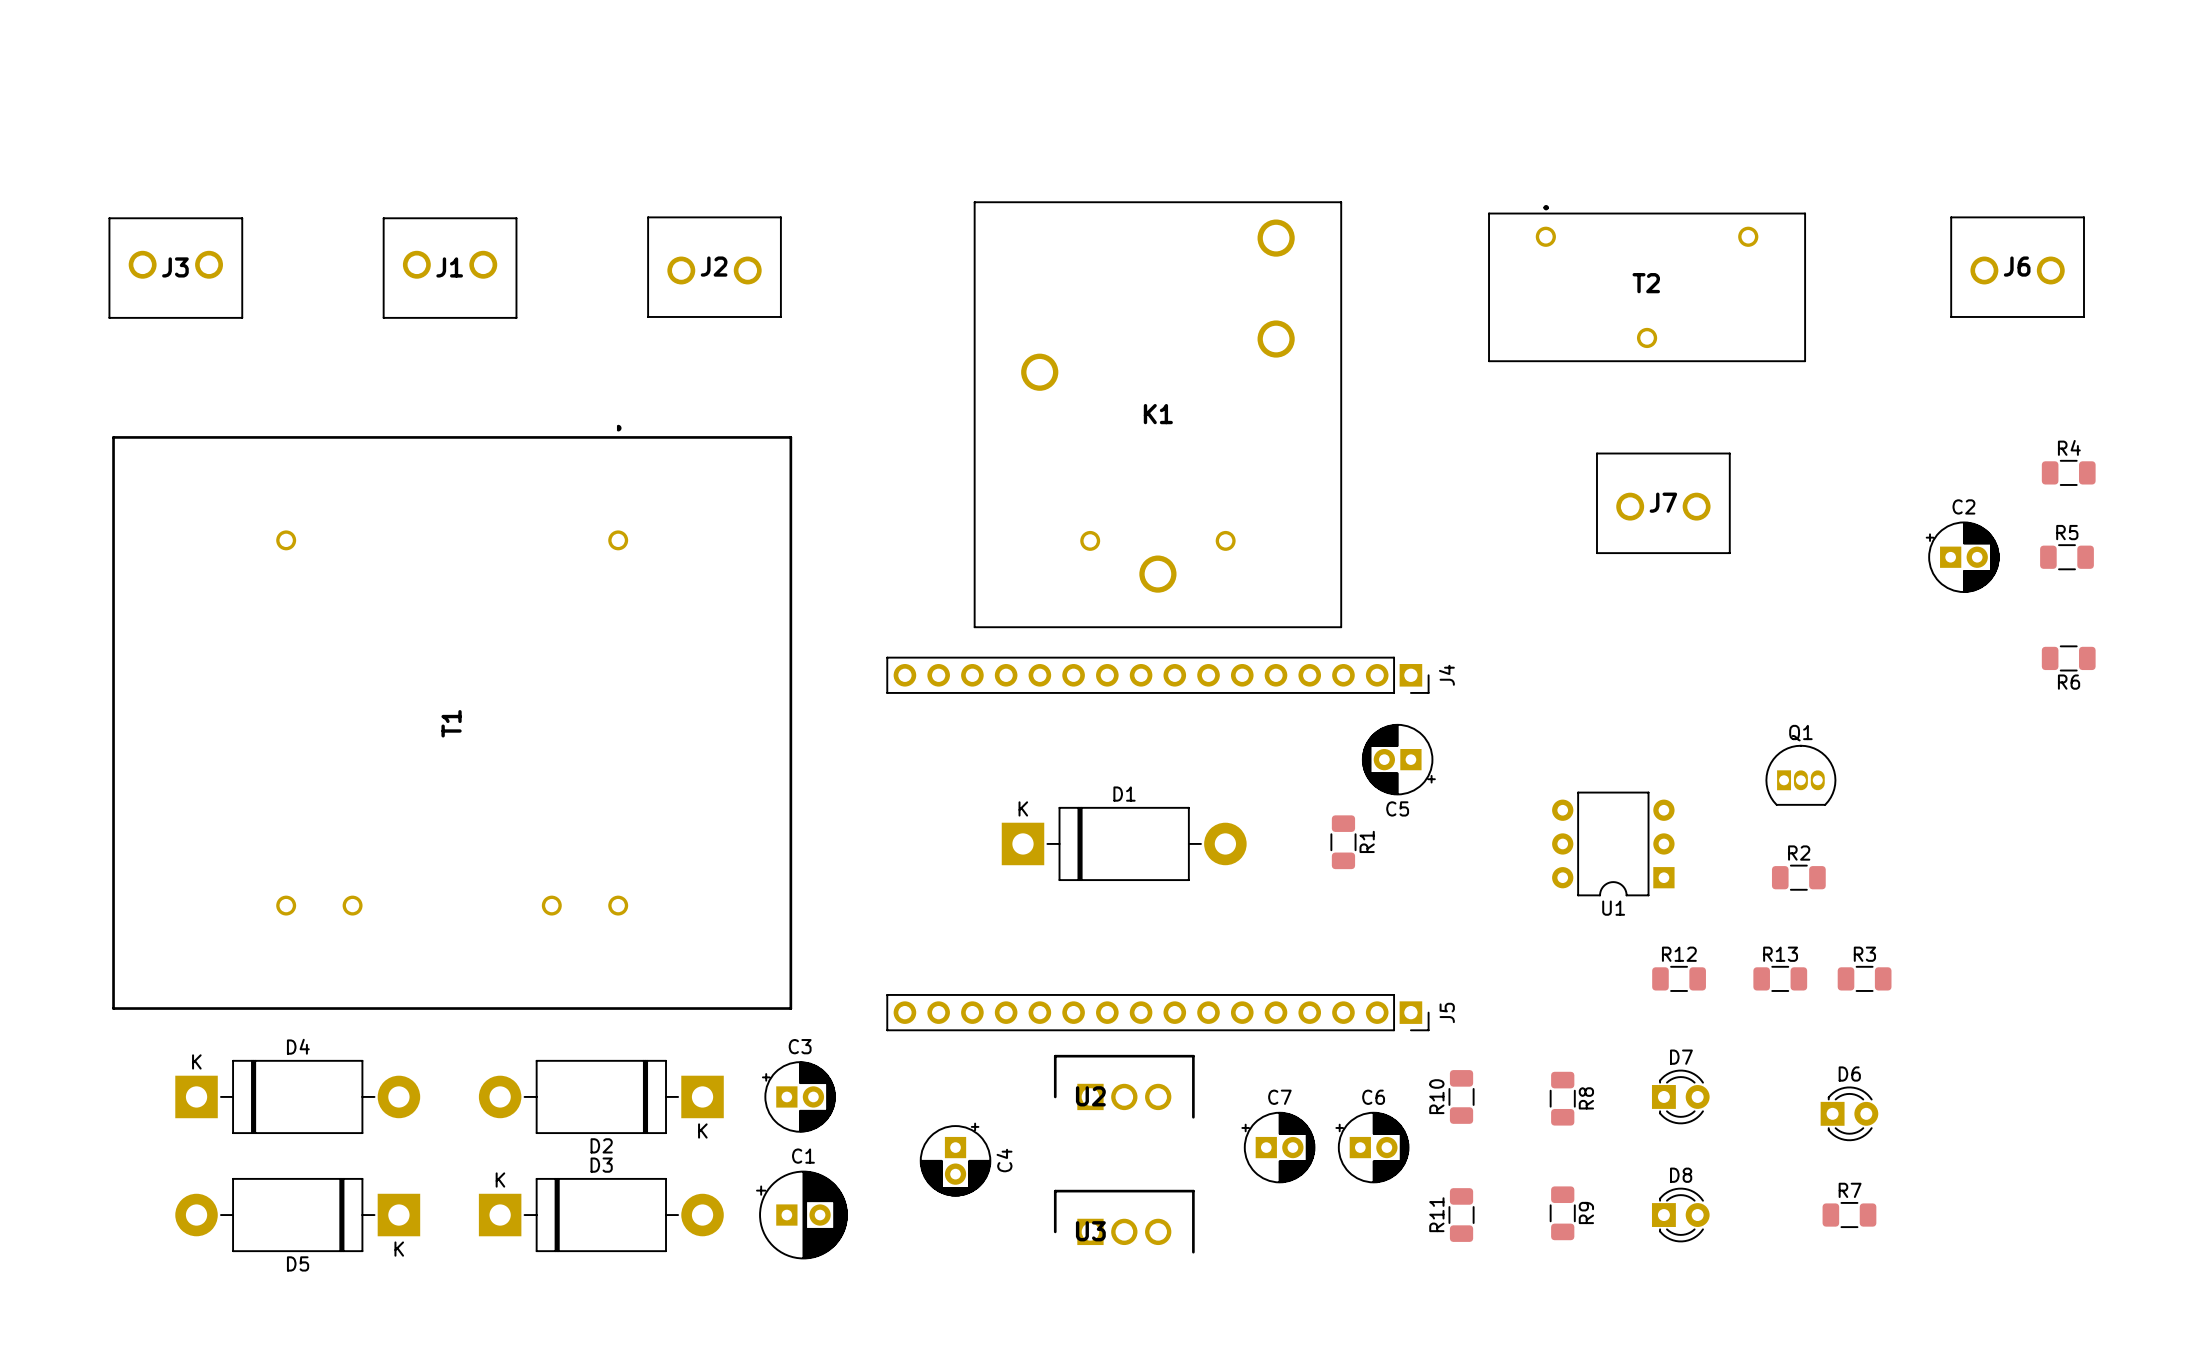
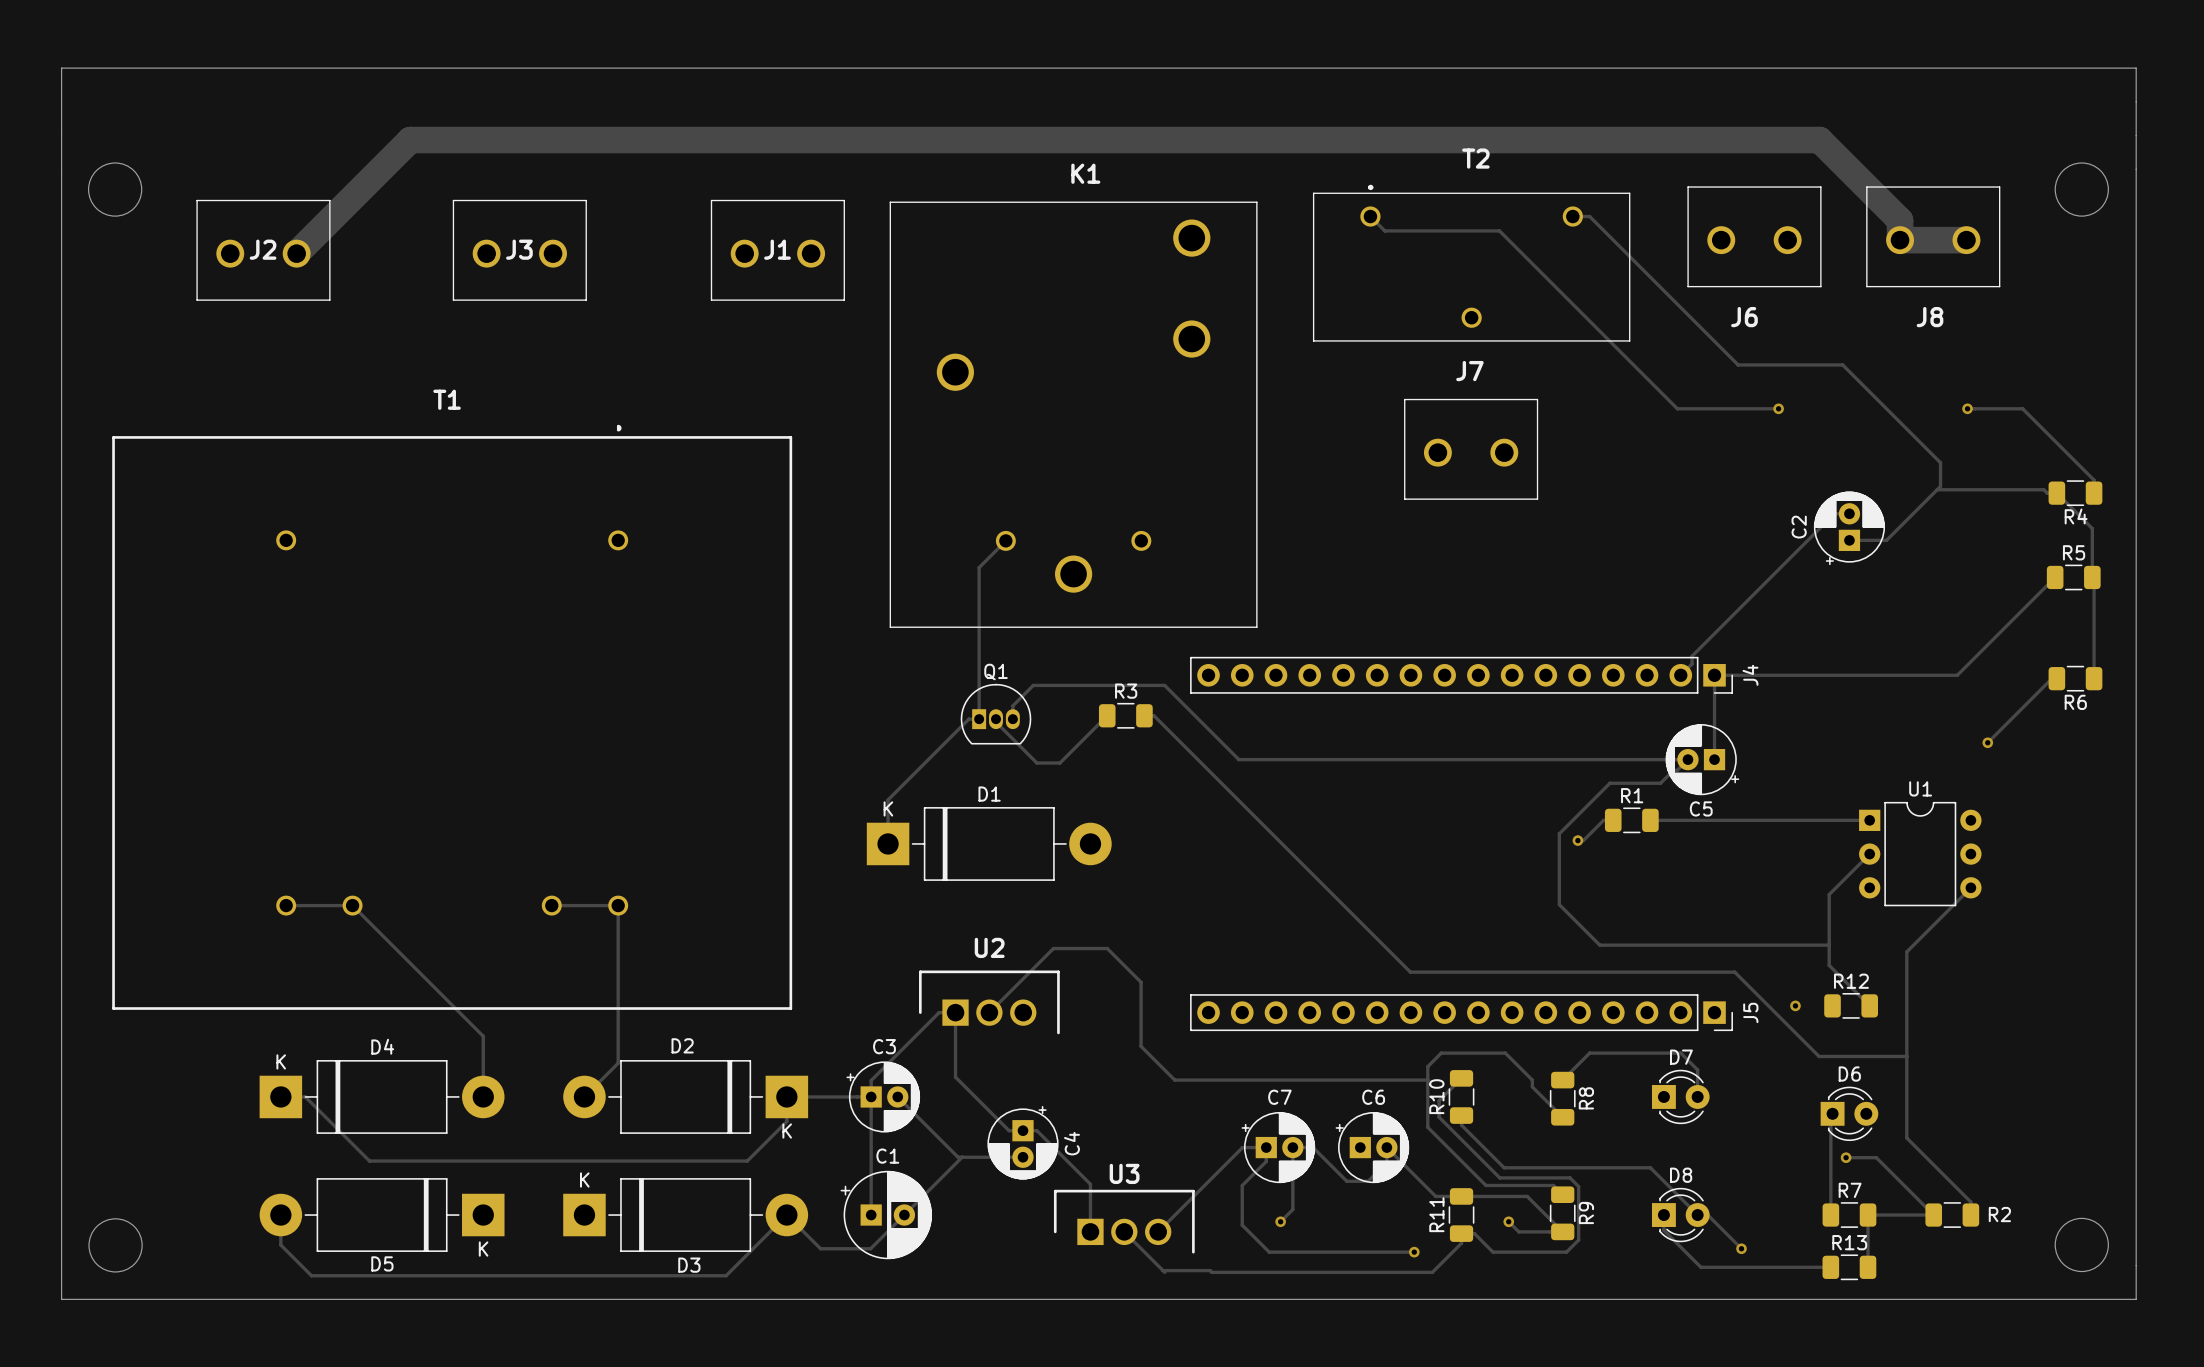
board edge: none -> (61, 68) (61, 1299) (2136, 1299) (2136, 68) (61, 68)
round board edge: none -> [88, 162, 143, 217]
round board edge: none -> [2054, 162, 2109, 217]
track: none -> (1370, 216) (1384, 230) (1499, 230) (1677, 408) (1778, 408)
track: none -> (1572, 216) (1589, 216) (1738, 364) (1842, 364) (1940, 462) (1940, 486) (1886, 540) (1849, 540)
J8: none -> (1933, 236)
track: none -> (1966, 240) (1900, 240) (1900, 220) (1819, 140) (410, 140) (296, 253)
J6 name position: J6 (2017, 266) -> J6 (1744, 317)
J2 position: (714, 267) -> (263, 250)
J6 position: (2017, 267) -> (1754, 236)
J3 rotation: 0° (175, 268) -> 180° (519, 250)
J3 position: (175, 268) -> (519, 250)
J1 rotation: 0° (450, 268) -> 180° (777, 250)
J1 position: (450, 268) -> (777, 250)
T2 name position: T2 (1646, 283) -> T2 (1475, 158)
T2 position: (1647, 283) -> (1471, 263)
via: none -> (1778, 408)
track: none -> (1967, 408) (2022, 408) (2094, 480) (2094, 493)
via: none -> (1967, 408)
K1 position: (1157, 414) -> (1073, 414)
K1 name position: K1 (1158, 414) -> K1 (1085, 173)
R4 name position: R4 (2069, 447) -> R4 (2076, 516)
R4 position: (2068, 472) -> (2075, 493)
track: none -> (1937, 489) (2043, 489) (2047, 493) (2056, 493) (2092, 528) (2094, 678)
J7 name position: J7 (1663, 502) -> J7 (1469, 371)
J7 position: (1663, 503) -> (1471, 449)
track: none -> (1849, 513) (1834, 513) (1692, 656) (1692, 664) (1680, 675)
track: none -> (1005, 540) (979, 567) (979, 719) (968, 719) (888, 799) (888, 843)
C2 rotation: 0° (1962, 557) -> 90° counterclockwise (1849, 528)
C2 position: (1962, 557) -> (1849, 528)
R5 position: (2066, 557) -> (2073, 577)
track: none -> (2055, 577) (1957, 675) (1714, 675) (1714, 759)
R6 position: (2068, 658) -> (2075, 678)
J4 position: (1157, 675) -> (1461, 675)
track: none -> (2056, 678) (2051, 678) (1987, 742)
track: none -> (1107, 715) (1060, 763) (1036, 763) (996, 722) (996, 719)
track: none -> (1144, 715) (1154, 715) (1410, 972) (1734, 972) (1819, 1056) (1906, 1056)
track: none -> (1012, 719) (1012, 705) (1033, 685) (1164, 685) (1238, 759) (1687, 759) (1660, 783) (1609, 783) (1559, 833) (1559, 904) (1599, 945) (1829, 945)
T1 name rotation: 0° (451, 723) -> 90° clockwise (447, 399)
T1 name position: T1 (451, 723) -> T1 (447, 399)
via: none -> (1987, 742)
C5 position: (1398, 759) -> (1702, 759)
Q1 position: (1800, 775) -> (996, 714)
track: none -> (1613, 820) (1603, 820) (1583, 840) (1577, 840)
track: none -> (1650, 820) (1869, 820)
via: none -> (1577, 840)
R1 name position: R1 (1367, 841) -> R1 (1632, 795)
R1 rotation: 0° (1343, 842) -> 90° clockwise (1631, 820)
R1 position: (1343, 842) -> (1631, 820)
D1 position: (1124, 843) -> (989, 843)
U1 rotation: 0° (1613, 843) -> 180° (1920, 854)
U1 position: (1613, 843) -> (1920, 854)
R2 name position: R2 (1799, 853) -> R2 (1999, 1214)
track: none -> (1869, 854) (1829, 894) (1829, 965) (1869, 1005)
R2 position: (1798, 877) -> (1952, 1215)
track: none -> (1970, 887) (1906, 951) (1906, 1137) (1970, 1202) (1970, 1215)
track: none -> (286, 905) (352, 905) (483, 1036) (483, 1096)
track: none -> (551, 905) (618, 905) (618, 1063) (584, 1096)
R12 position: (1679, 978) -> (1851, 1005)
R13 position: (1780, 978) -> (1849, 1267)
R3 position: (1864, 978) -> (1125, 715)
via: none -> (1795, 1005)
track: none -> (989, 1012) (1053, 948) (1107, 948) (1141, 982) (1141, 1046) (1174, 1080) (1427, 1080)
J5 position: (1157, 1012) -> (1461, 1012)
track: none -> (1461, 1078) (1439, 1100) (1439, 1117) (1499, 1177) (1570, 1177) (1578, 1186) (1578, 1240) (1566, 1252) (1492, 1252) (1474, 1233) (1461, 1233) (1461, 1243) (1432, 1272) (1163, 1270)
track: none -> (1562, 1080) (1589, 1053) (1680, 1053) (1697, 1069) (1697, 1096)
U2 position: (1124, 1086) -> (989, 1002)
track: none -> (280, 1096) (305, 1096) (369, 1161) (747, 1161) (786, 1121) (786, 1096) (871, 1096)
D4 position: (297, 1096) -> (382, 1096)
D2 position: (601, 1096) -> (685, 1096)
C3 position: (798, 1096) -> (883, 1096)
track: none -> (897, 1096) (958, 1157) (1022, 1157)
U2 name position: U2 (1090, 1096) -> U2 (989, 947)
track: none -> (1832, 1113) (1830, 1115) (1830, 1215)
track: none -> (1461, 1115) (1461, 1125) (1504, 1167) (1650, 1167) (1697, 1215) (1707, 1215) (1741, 1248)
track: none -> (1562, 1117) (1532, 1086) (1532, 1080) (1505, 1053) (1441, 1053) (1427, 1066) (1427, 1127) (1485, 1185) (1553, 1185) (1562, 1194)
D2 name position: D2 (601, 1145) -> D2 (682, 1045)
track: none -> (962, 1157) (870, 1248) (820, 1248) (786, 1215) (726, 1275) (311, 1275) (280, 1245) (280, 1215)
track: none -> (1846, 1157) (1876, 1157) (1933, 1215) (1868, 1215) (1868, 1267)
via: none -> (1846, 1157)
C4 position: (955, 1159) -> (1022, 1142)
D3 name position: D3 (601, 1165) -> D3 (689, 1265)
D5 position: (297, 1215) -> (382, 1215)
D3 position: (601, 1215) -> (685, 1215)
C1 position: (801, 1215) -> (886, 1215)
track: none -> (871, 1215) (871, 1080) (939, 1012) (955, 1012) (955, 1077) (1009, 1130) (1036, 1130) (1090, 1184) (1090, 1231)
track: none -> (1663, 1215) (1663, 1230) (1700, 1267) (1830, 1267)
round board edge: none -> [88, 1218, 143, 1273]
round board edge: none -> [2054, 1218, 2109, 1272]
track: none -> (1280, 1221) (1292, 1209) (1292, 1147) (1313, 1147) (1346, 1181) (1368, 1181) (1386, 1162) (1386, 1147) (1435, 1196) (1527, 1196) (1562, 1231) (1518, 1231) (1508, 1221)
via: none -> (1280, 1221)
via: none -> (1508, 1221)
U3 name position: U3 (1090, 1231) -> U3 (1124, 1173)
track: none -> (1124, 1231) (1164, 1272)
track: none -> (1158, 1231) (1242, 1147) (1266, 1147) (1266, 1161) (1242, 1185) (1242, 1225) (1269, 1252) (1414, 1252)
via: none -> (1741, 1248)
via: none -> (1414, 1252)

